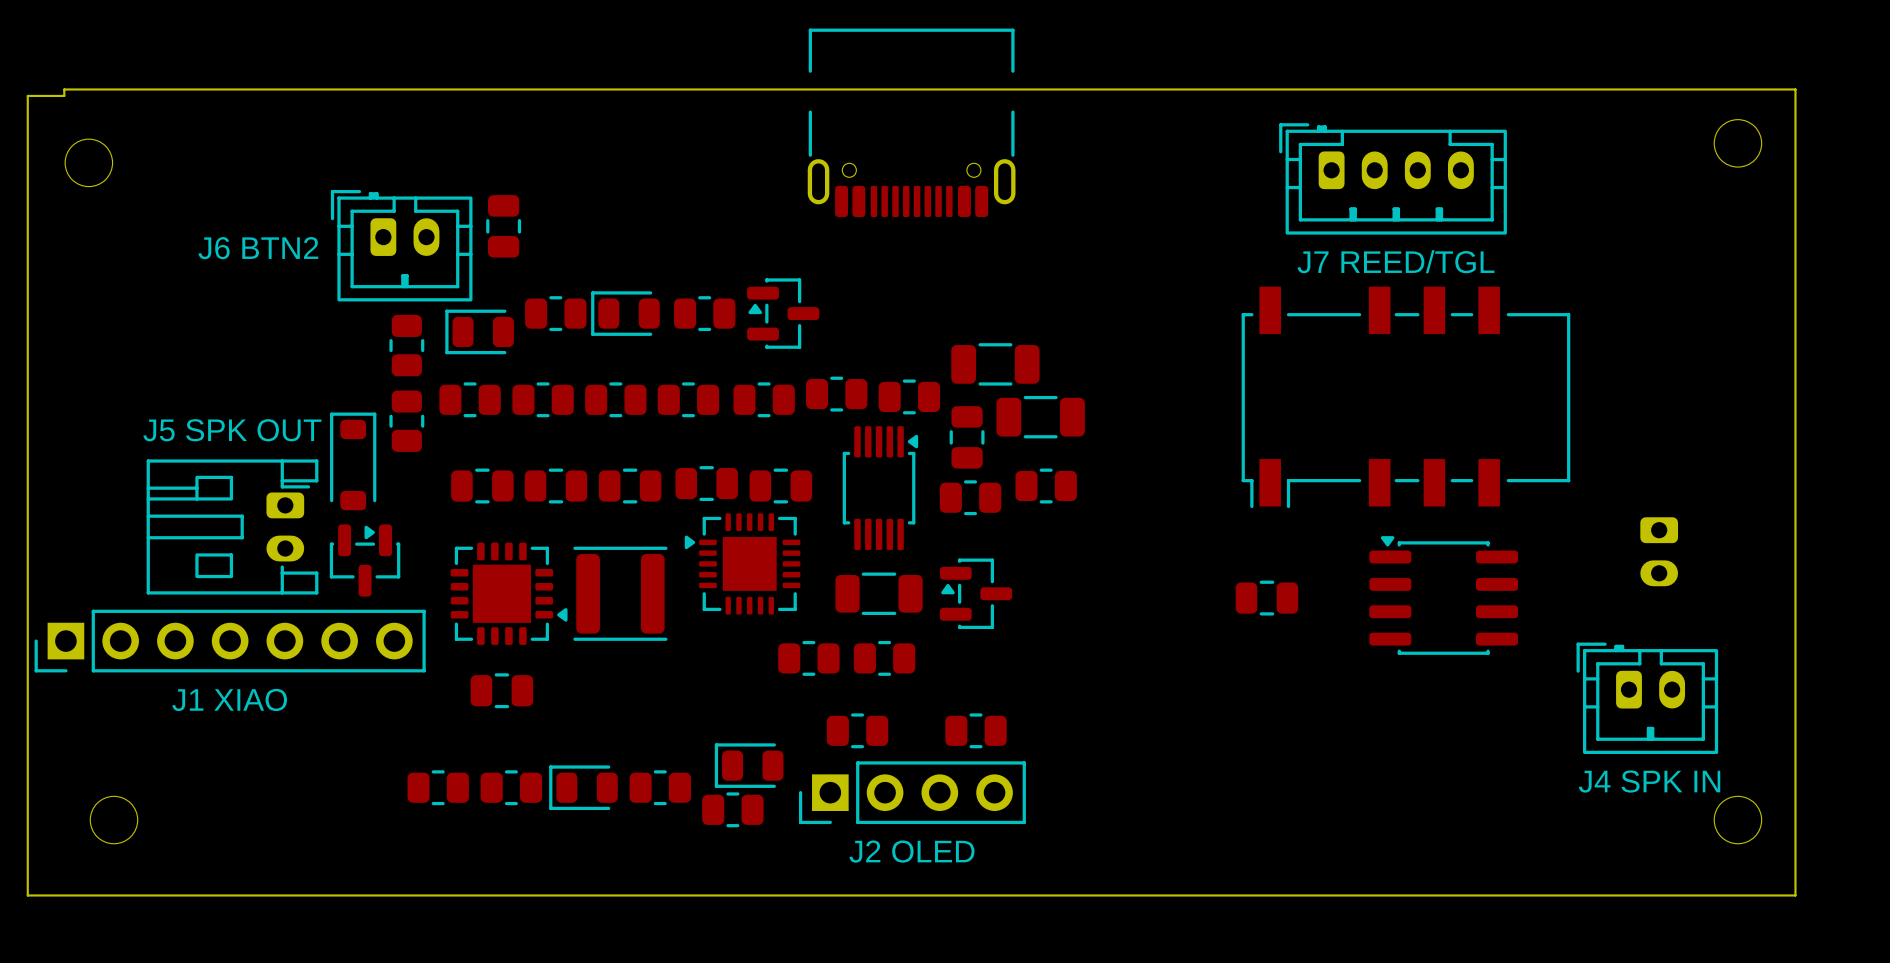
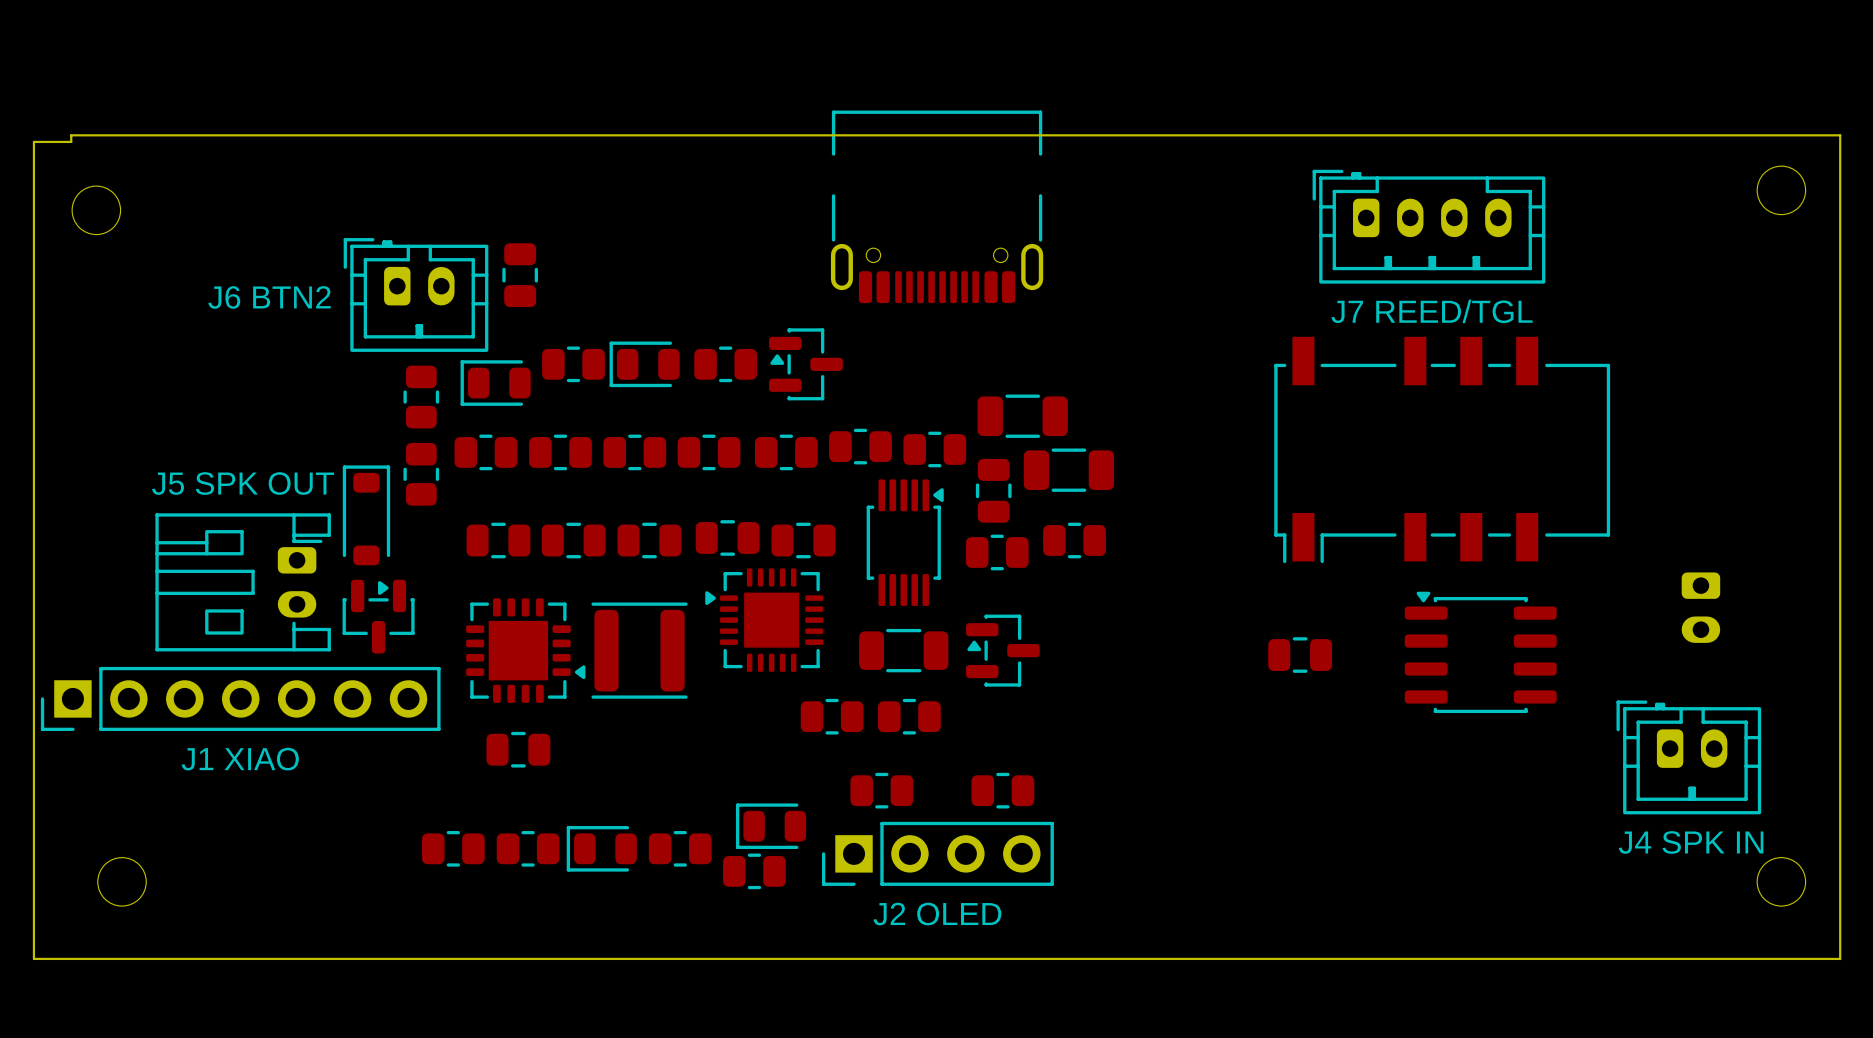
part position: (911, 122) -> (937, 206)

